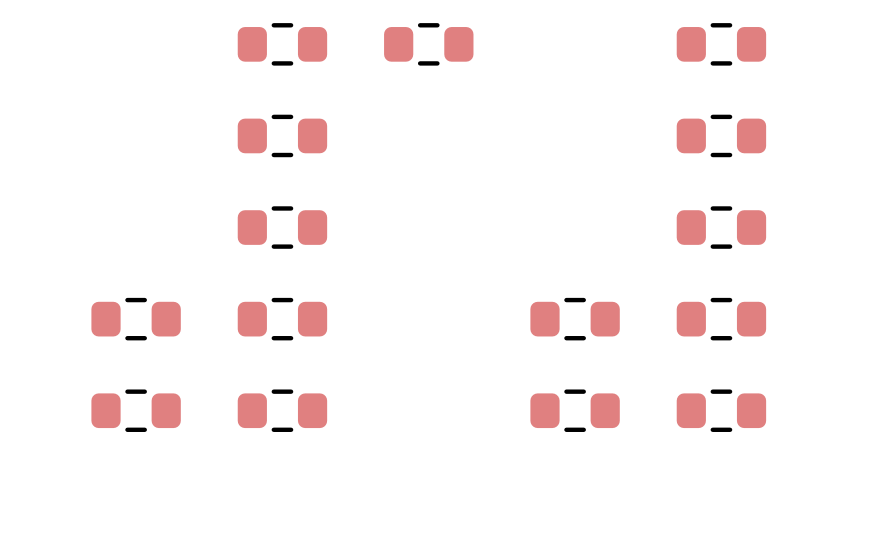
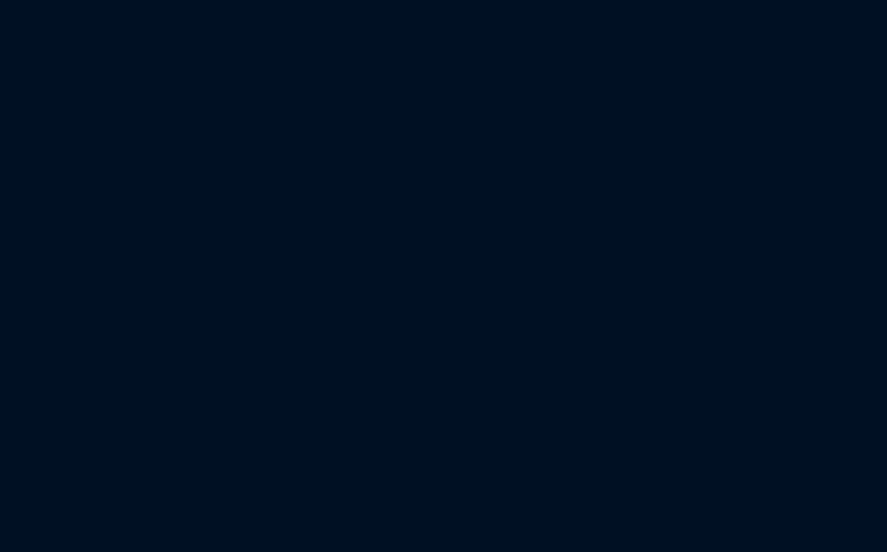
part: (282, 44) -> none
part: (428, 44) -> none
part: (721, 44) -> none
part: (282, 135) -> none
part: (721, 135) -> none
part: (282, 227) -> none
part: (721, 227) -> none
part: (136, 319) -> none
part: (282, 319) -> none
part: (575, 319) -> none
part: (721, 319) -> none
part: (136, 410) -> none
part: (282, 410) -> none
part: (575, 410) -> none
part: (721, 410) -> none

